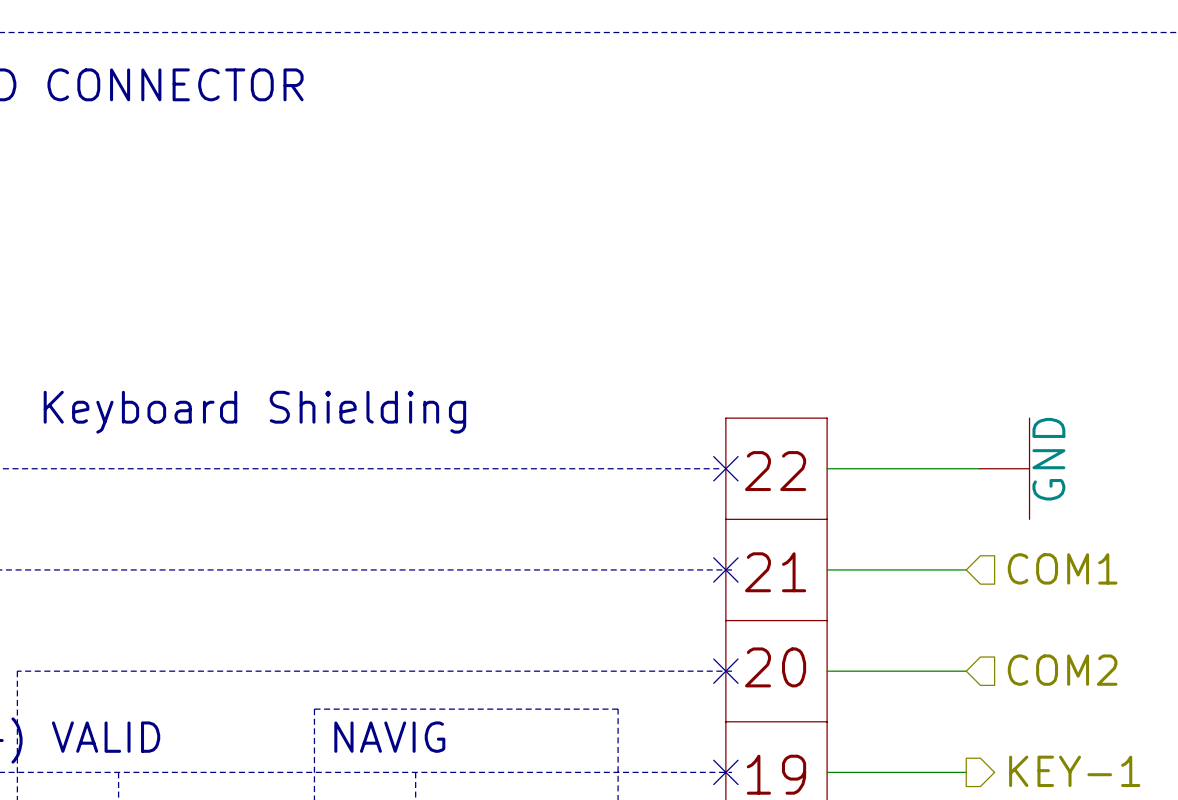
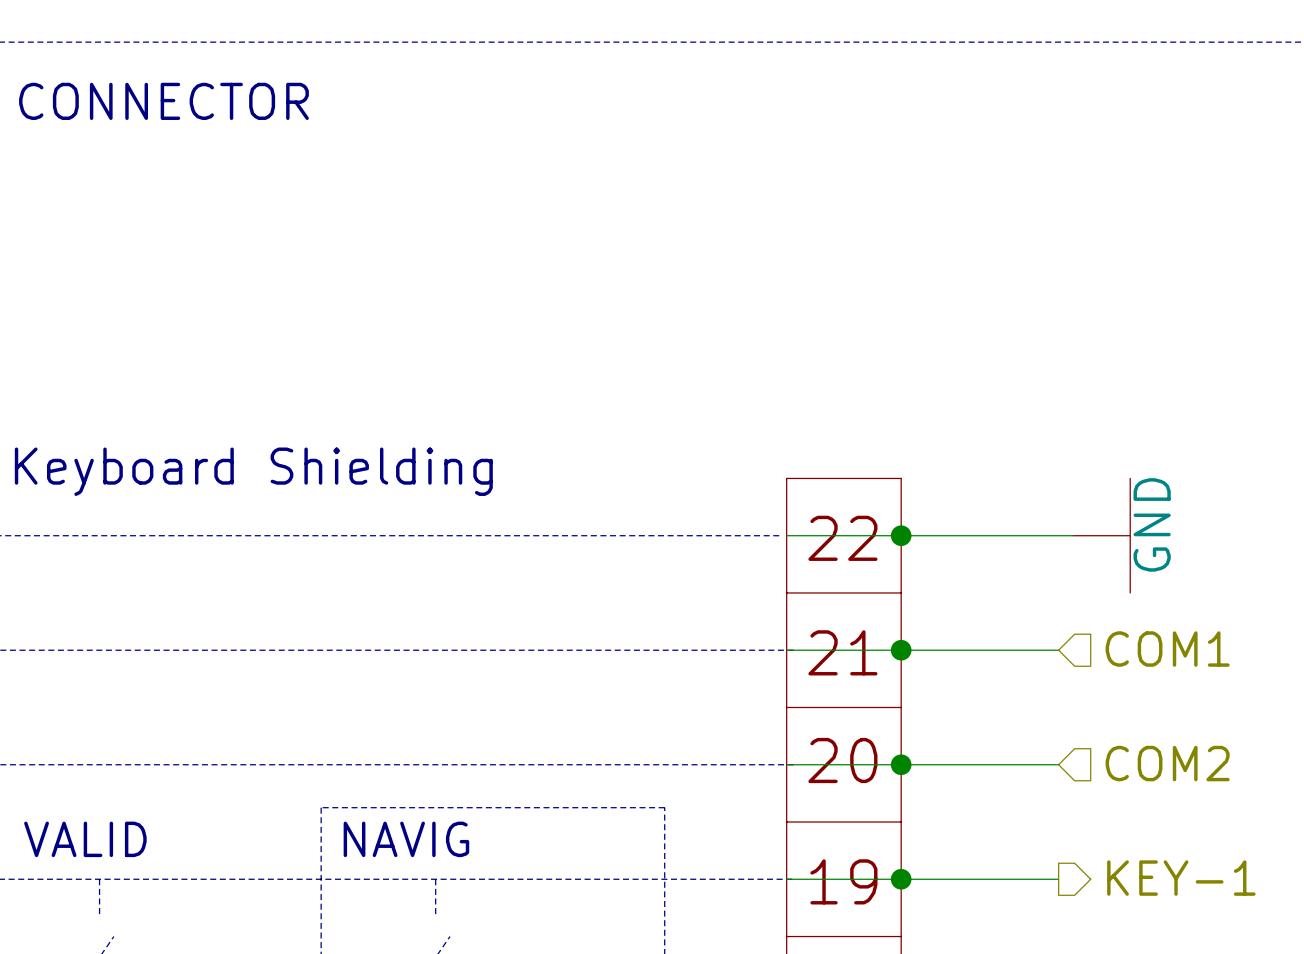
wire: none -> (786, 535) (901, 535)
no-connect mark: (725, 468) -> none
junction: none -> (901, 535)
wire: none -> (786, 650) (901, 650)
no-connect mark: (725, 569) -> none
junction: none -> (901, 650)
wire: none -> (786, 764) (901, 764)
no-connect mark: (725, 671) -> none
junction: none -> (901, 764)
wire: none -> (786, 879) (901, 879)
no-connect mark: (725, 772) -> none
junction: none -> (901, 879)

